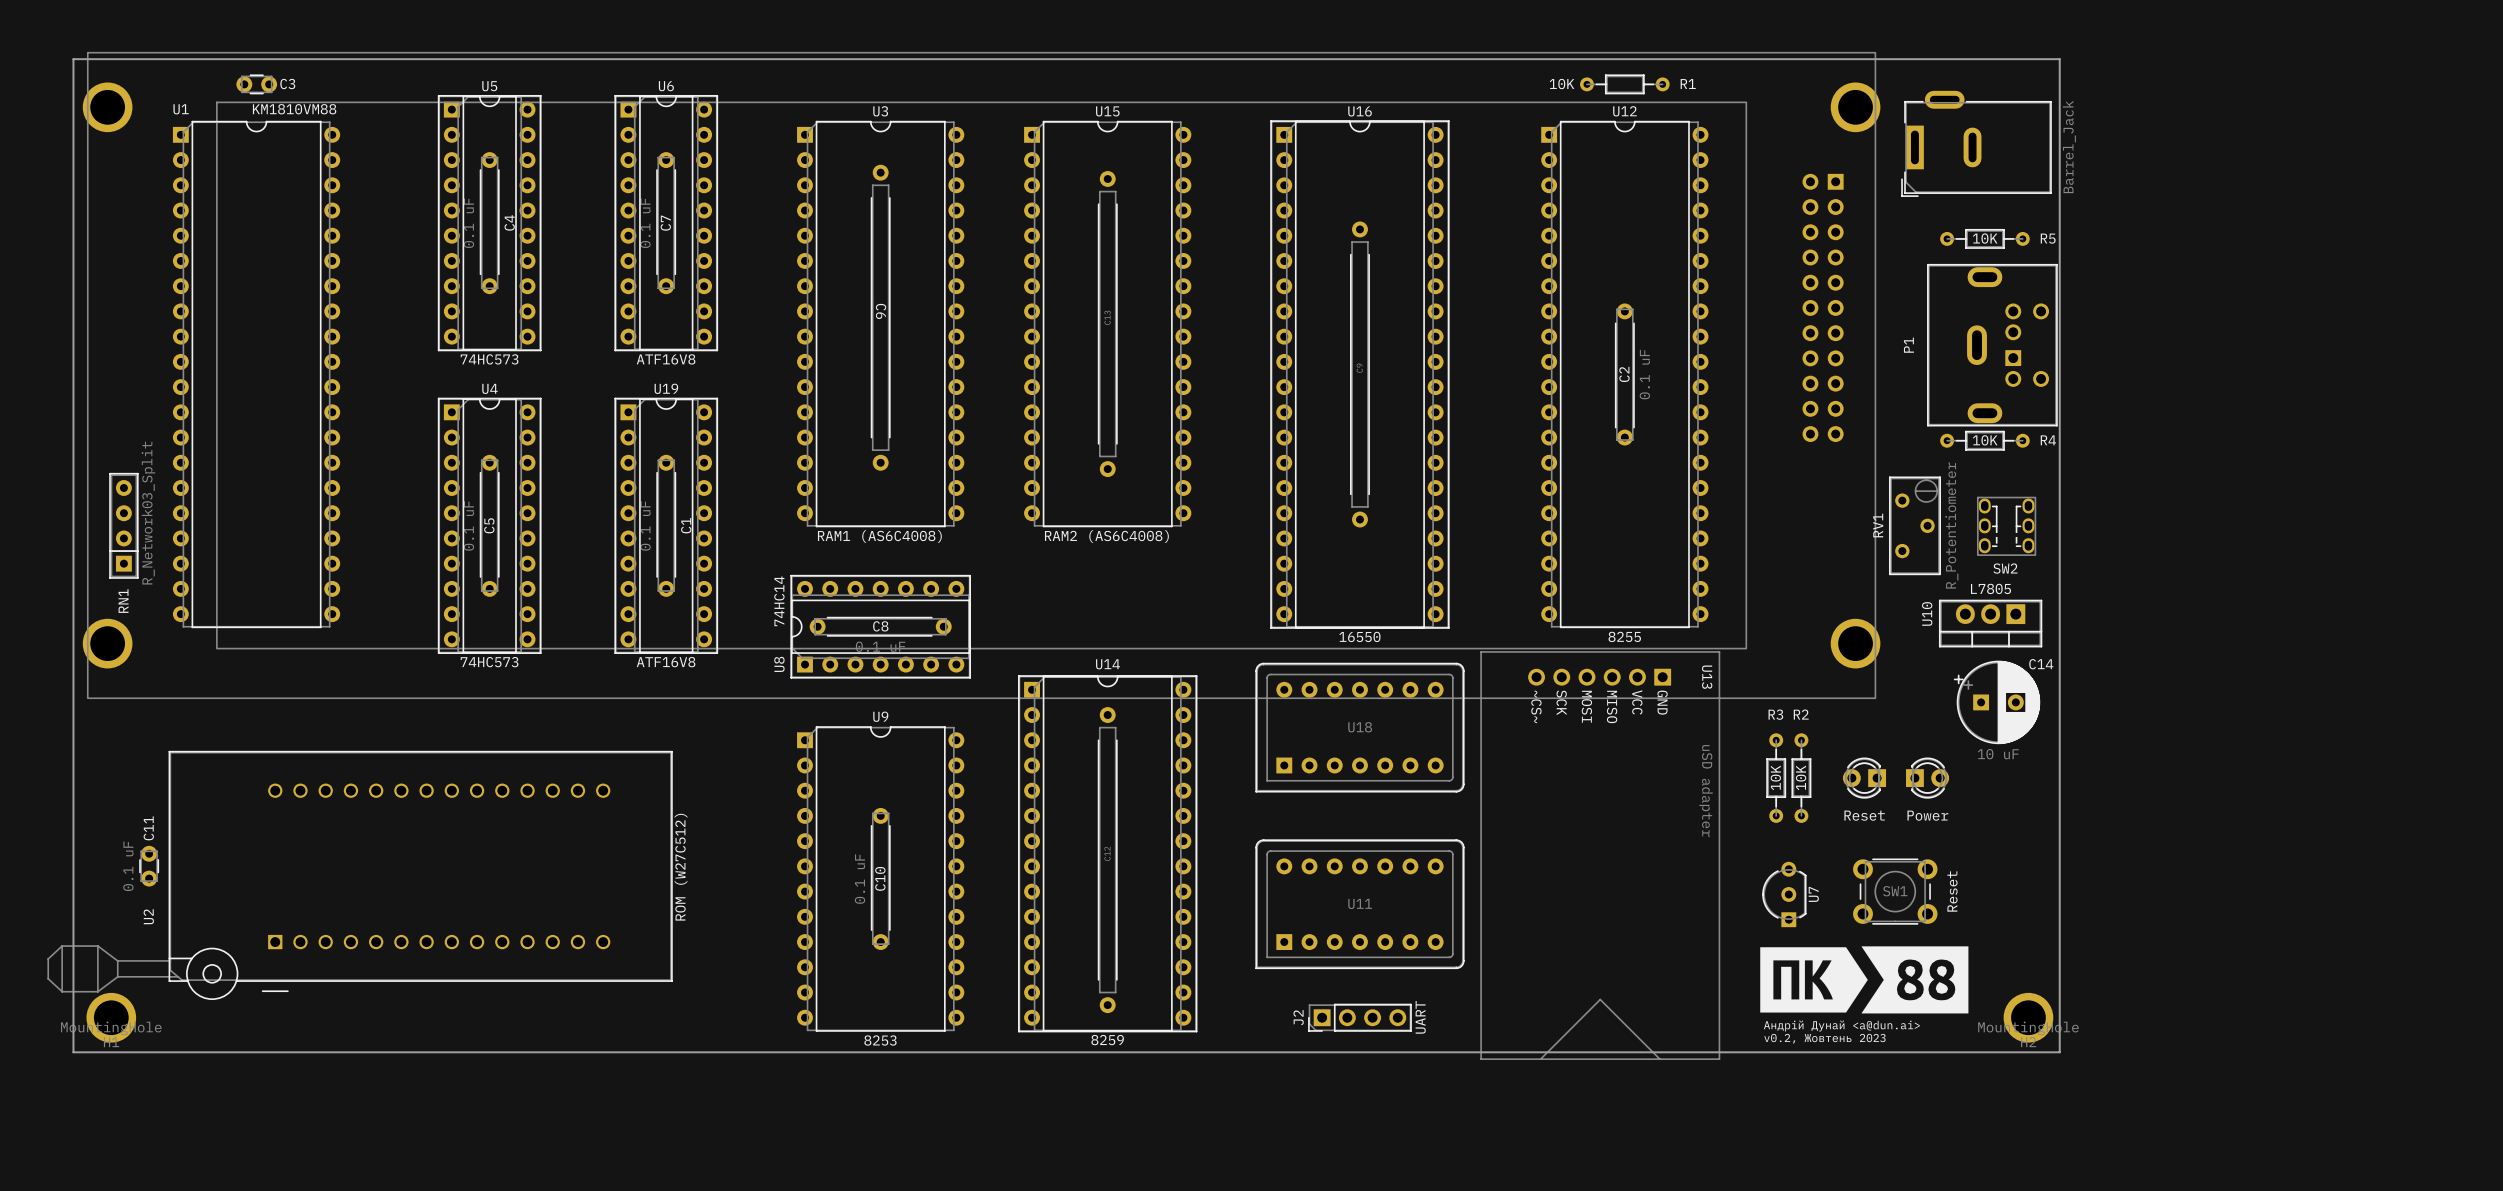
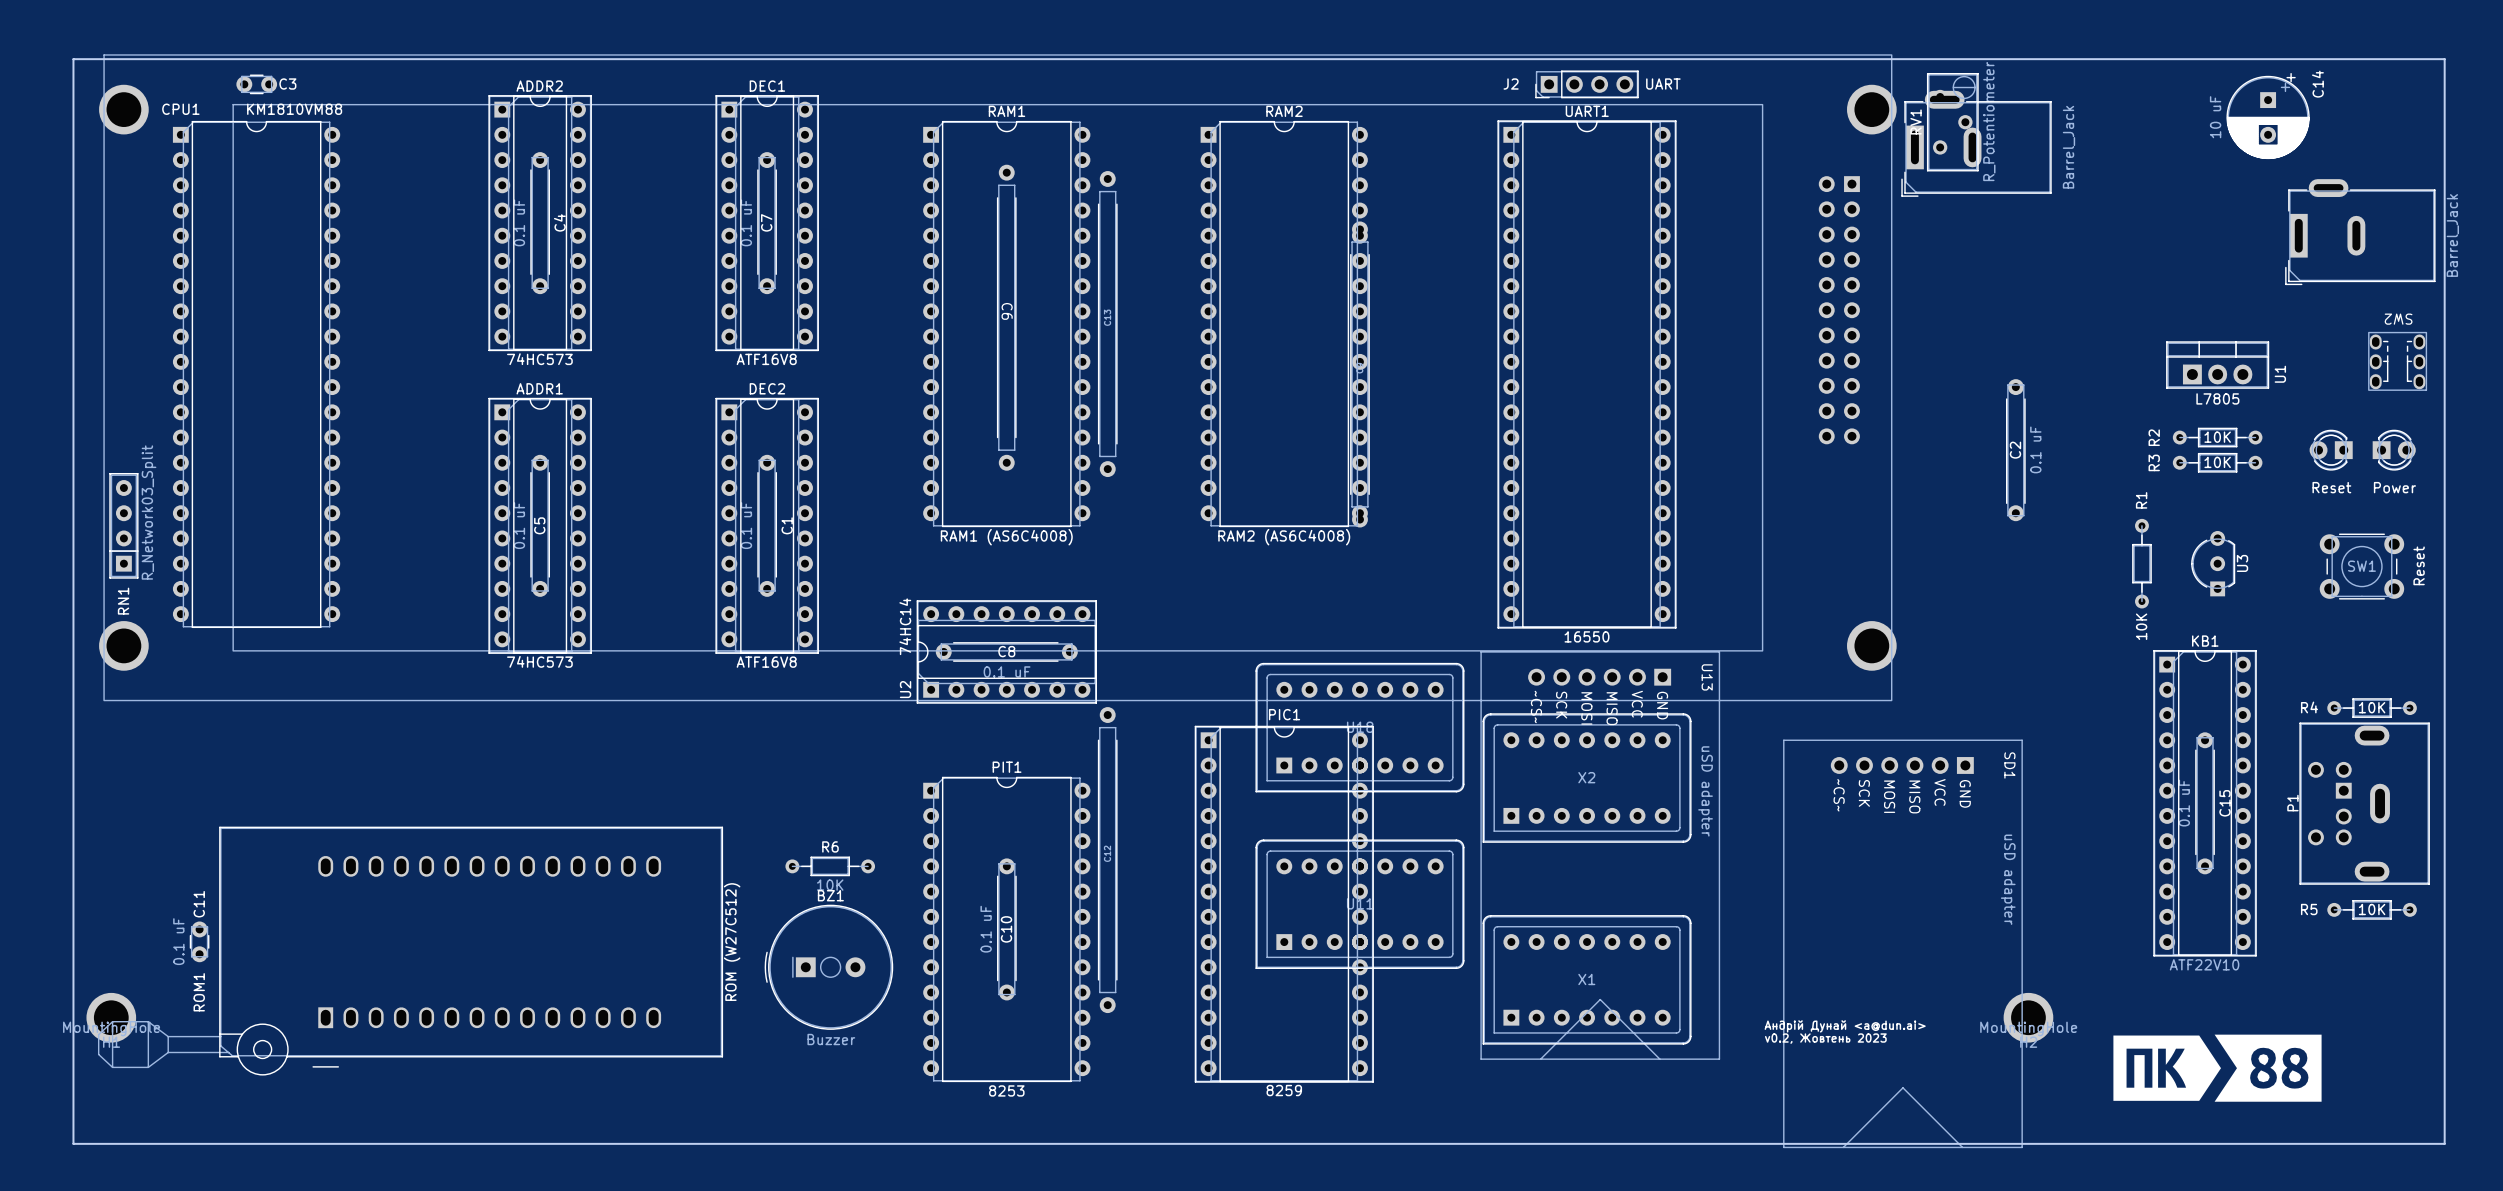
board edge: (2059, 59) (2059, 1052) (73, 1052) -> (2059, 59) (2444, 59) (2444, 1143) (73, 1143) (73, 1052)
R1 value position: 10K (1562, 84) -> 10K (2141, 626)
R1 rotation: 0° (1624, 84) -> 90° clockwise (2141, 563)
R1 position: (1624, 84) -> (2141, 563)
R1 name position: R1 (1688, 84) -> R1 (2141, 500)
U1 name: U1 (181, 109) -> CPU1 (180, 109)
U3 name position: U3 (880, 111) -> U3 (2242, 563)
U3 footprint: [797, 121, 965, 528] -> [2191, 531, 2236, 597]
C4 position: (489, 223) -> (540, 223)
U5: 74HC573 (489, 223) -> none
ADDR2: none -> 74HC573 (540, 223)
C7 position: (666, 223) -> (767, 223)
U6: ATF16V8 (666, 223) -> none
DEC1: none -> ATF16V8 (767, 223)
part: none -> Barrel_Jack (2360, 232)
R5 position: (1984, 238) -> (2372, 909)
R5 name position: R5 (2048, 238) -> R5 (2309, 909)
C6 position: (880, 317) -> (1006, 317)
RAM1: none -> RAM1 (AS6C4008) (1006, 324)
U15: RAM2 (AS6C4008) (1107, 324) -> none
RAM2: none -> RAM2 (AS6C4008) (1284, 324)
P1 rotation: 0° (1992, 345) -> 180° (2364, 803)
P1 position: (1992, 345) -> (2364, 803)
U1: none -> L7805 (2217, 365)
U16: 16550 (1359, 374) -> none
UART1: none -> 16550 (1587, 374)
C2 position: (1624, 374) -> (2015, 450)
U12: 8255 (1624, 374) -> none
part position: (981, 375) -> (997, 377)
R4 position: (1984, 440) -> (2372, 708)
R4 name position: R4 (2048, 440) -> R4 (2309, 707)
part: none -> Reset (2331, 450)
part: none -> Power (2394, 450)
RV1 footprint: [1889, 476, 1941, 575] -> [1927, 73, 1979, 172]
C5 position: (489, 525) -> (540, 525)
U4: 74HC573 (489, 525) -> none
ADDR1: none -> 74HC573 (540, 525)
C1 position: (666, 525) -> (767, 525)
U19: ATF16V8 (666, 525) -> none
DEC2: none -> ATF16V8 (767, 525)
SW2 rotation: 0° (2006, 526) -> 180° (2397, 361)
SW2 position: (2006, 526) -> (2397, 361)
U3 value: RAM1 (AS6C4008) (879, 536) -> none
U10: L7805 (1990, 623) -> none
C8 position: (880, 626) -> (1006, 651)
U8: 74HC14 (880, 626) -> none
C14 rotation: 0° (1997, 702) -> 90° clockwise (2268, 116)
C14 position: (1997, 702) -> (2268, 116)
R3 name position: R3 (1775, 714) -> R3 (2154, 462)
R2 name position: R2 (1801, 714) -> R2 (2154, 437)
U2 footprint: [47, 751, 673, 1000] -> [916, 600, 1097, 704]
X2: none -> (1587, 778)
R3 rotation: 0° (1776, 778) -> 90° clockwise (2217, 462)
R3 position: (1776, 778) -> (2217, 462)
R2 rotation: 0° (1801, 778) -> 90° clockwise (2217, 437)
R2 position: (1801, 778) -> (2217, 437)
part: Reset (1864, 778) -> none
part: Power (1927, 778) -> none
KB1: none -> ATF22V10 (2205, 803)
C15: none -> 0.1 uF (2205, 803)
U14: 8259 (1107, 853) -> none
C11 position: (149, 866) -> (199, 941)
R6: none -> 10K (830, 866)
U2 value: ROM (W27C512) (681, 867) -> 74HC14 (905, 626)
C10 position: (880, 878) -> (1006, 929)
U9: 8253 (880, 878) -> none
SW1 position: (1895, 891) -> (2361, 566)
U7: (1784, 894) -> none
PIC1: none -> 8259 (1284, 904)
U2 name position: U2 (148, 916) -> U2 (905, 689)
PIT1: none -> 8253 (1006, 929)
SD1: none -> uSD adapter (1902, 943)
drawing: [1760, 946, 1969, 1014] -> none
ROM1: none -> ROM (W27C512) (410, 951)
BZ1: none -> Buzzer (828, 967)
X1: none -> (1587, 979)
J2 name rotation: 0° (1298, 1017) -> 90° clockwise (1511, 84)
J2 position: (1359, 1017) -> (1587, 84)
J2 value rotation: 0° (1420, 1017) -> 90° clockwise (1663, 84)
drawing: none -> [2113, 1034, 2322, 1102]

